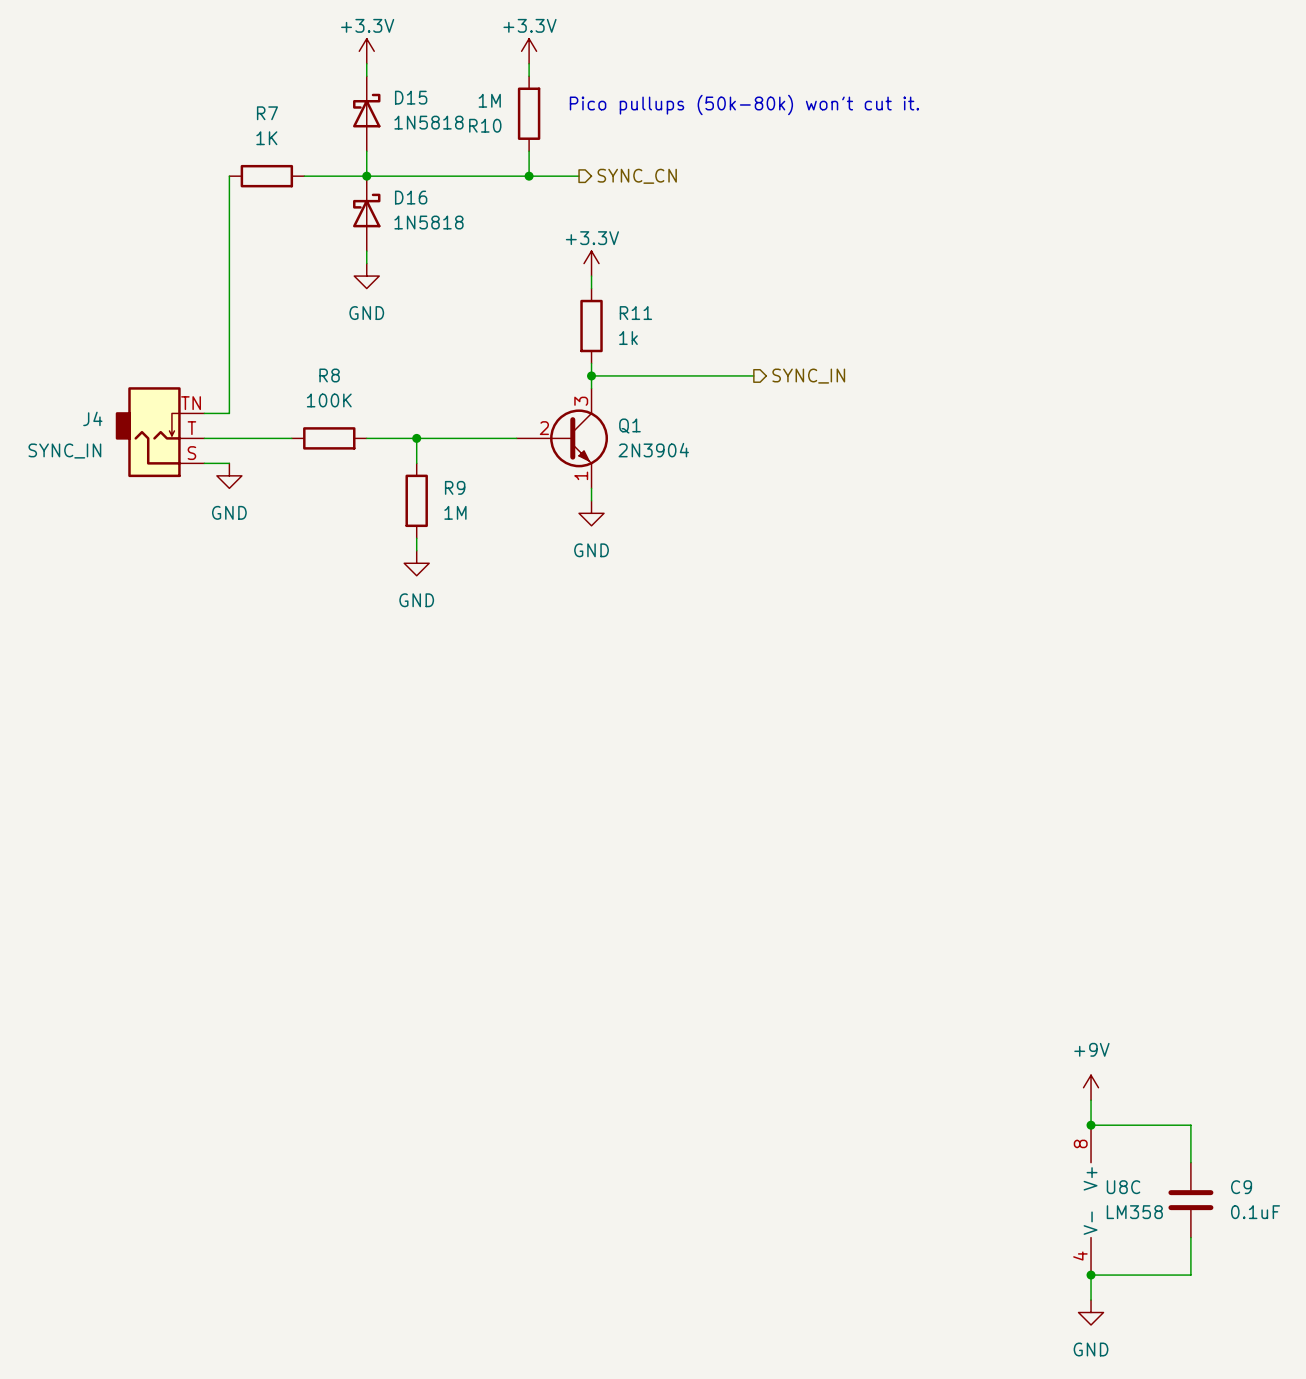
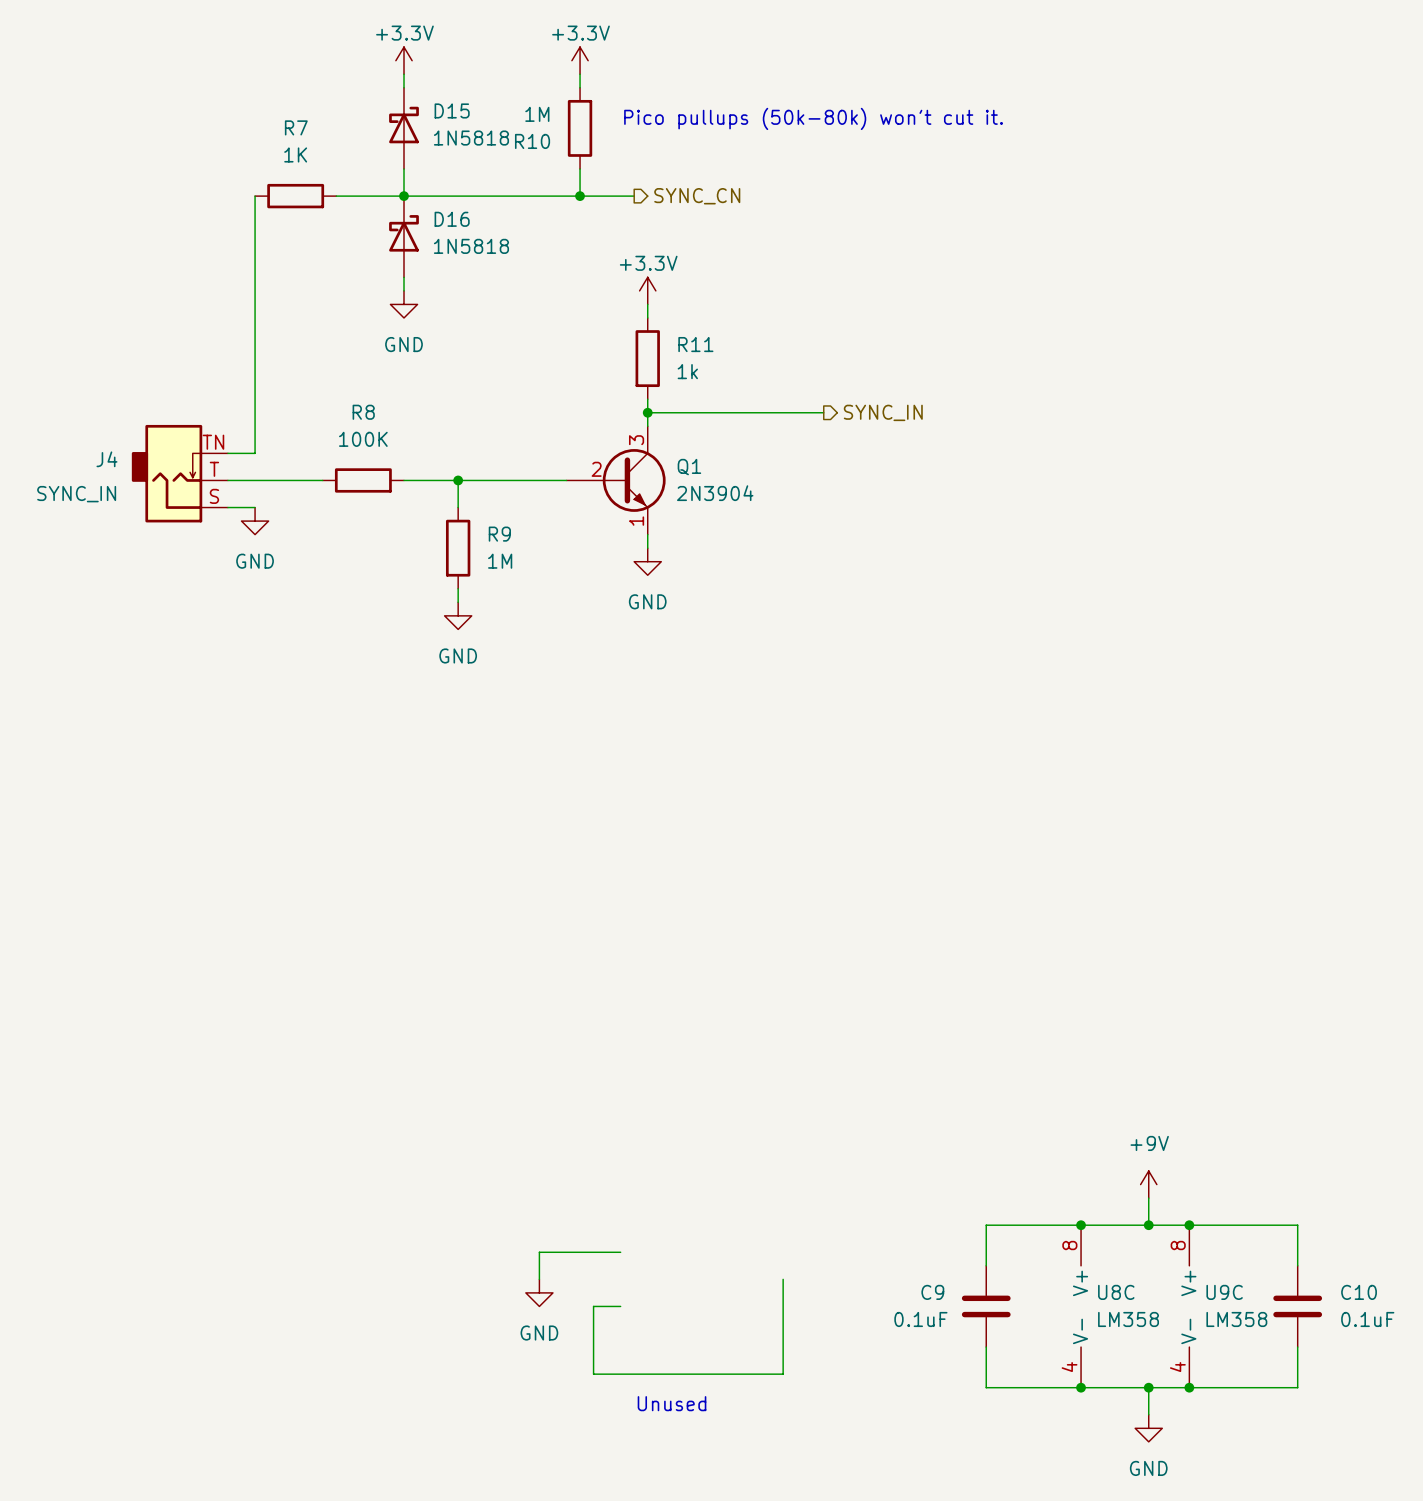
power symbol position: +9V (1091, 1087) -> +9V (1148, 1184)
wire: none -> (1148, 1198) (1148, 1225)
wire: (1091, 1100) (1091, 1125) -> (986, 1265) (986, 1225) (1189, 1225)
junction: none -> (1081, 1225)
junction: none -> (1148, 1225)
wire: none -> (620, 1252) (539, 1252) (539, 1279)
wire: none -> (783, 1279) (783, 1374) (593, 1374) (593, 1306) (620, 1306)
power symbol: none -> GND (539, 1292)
U8C name: U8C (1123, 1187) -> U9C (1224, 1292)
C9 name: C9 (1241, 1187) -> C10 (1359, 1292)
C9: none -> 0.1uF (986, 1306)
U8C: none -> LM358 (1081, 1306)
junction: none -> (1081, 1387)
wire: none -> (1148, 1387) (1148, 1414)
junction: none -> (1148, 1387)
wire: (1091, 1275) (1091, 1300) -> (1189, 1387) (986, 1387) (986, 1347)
text: none -> Unused (672, 1403)
power symbol position: GND (1091, 1312) -> GND (1148, 1428)

